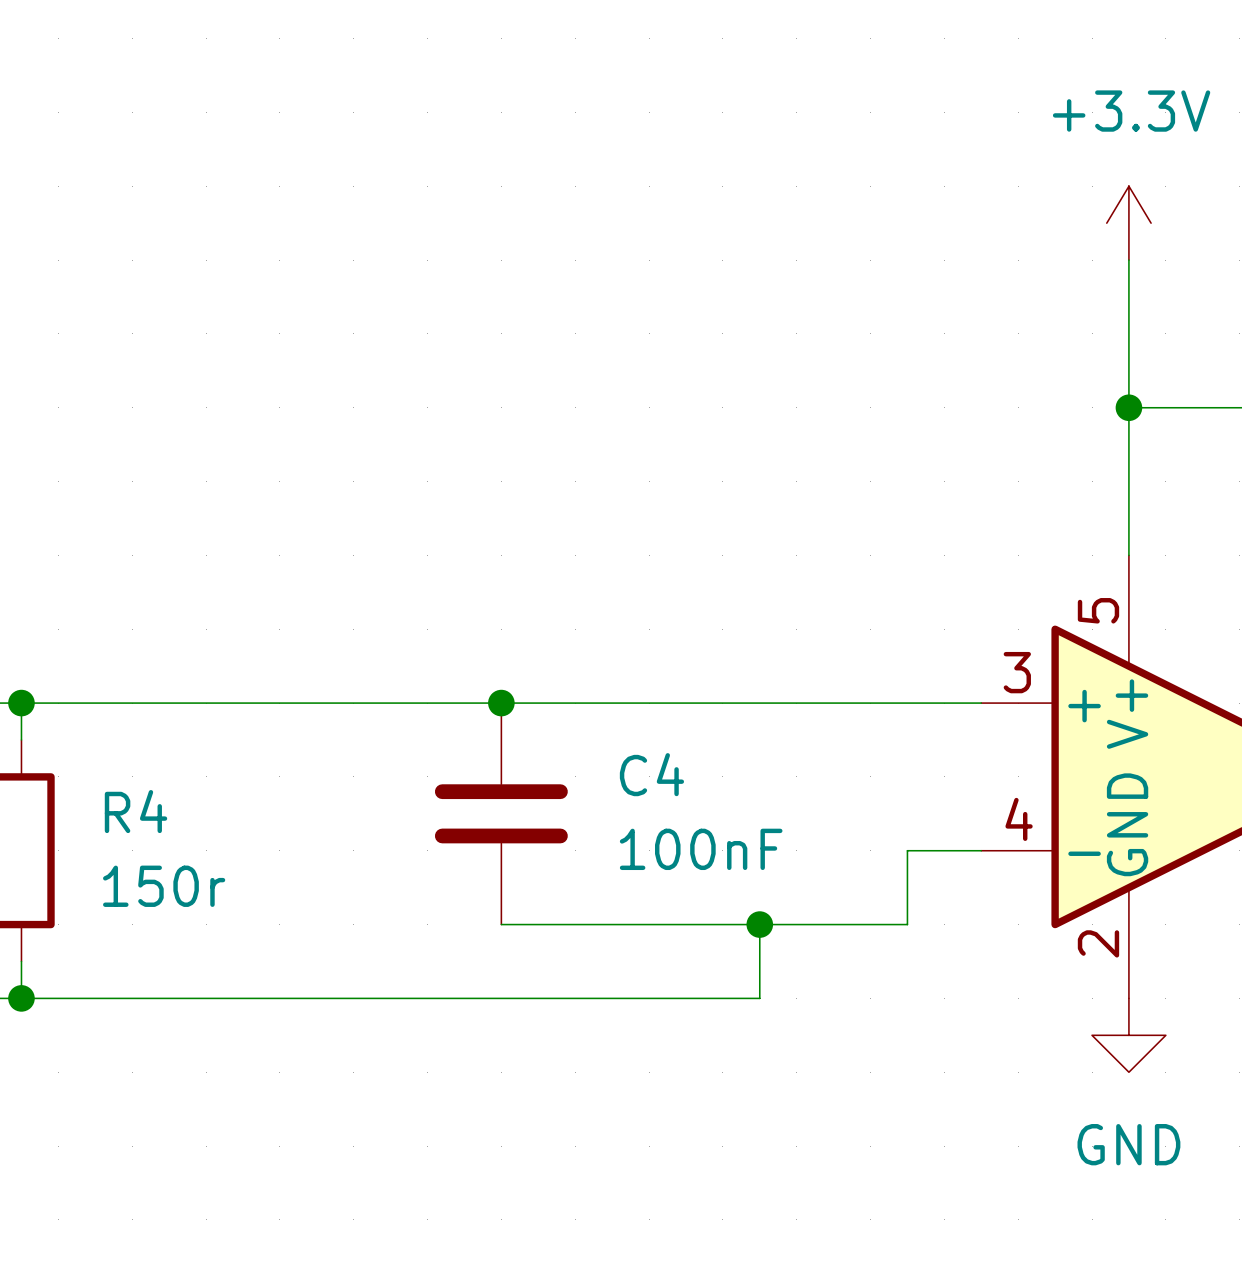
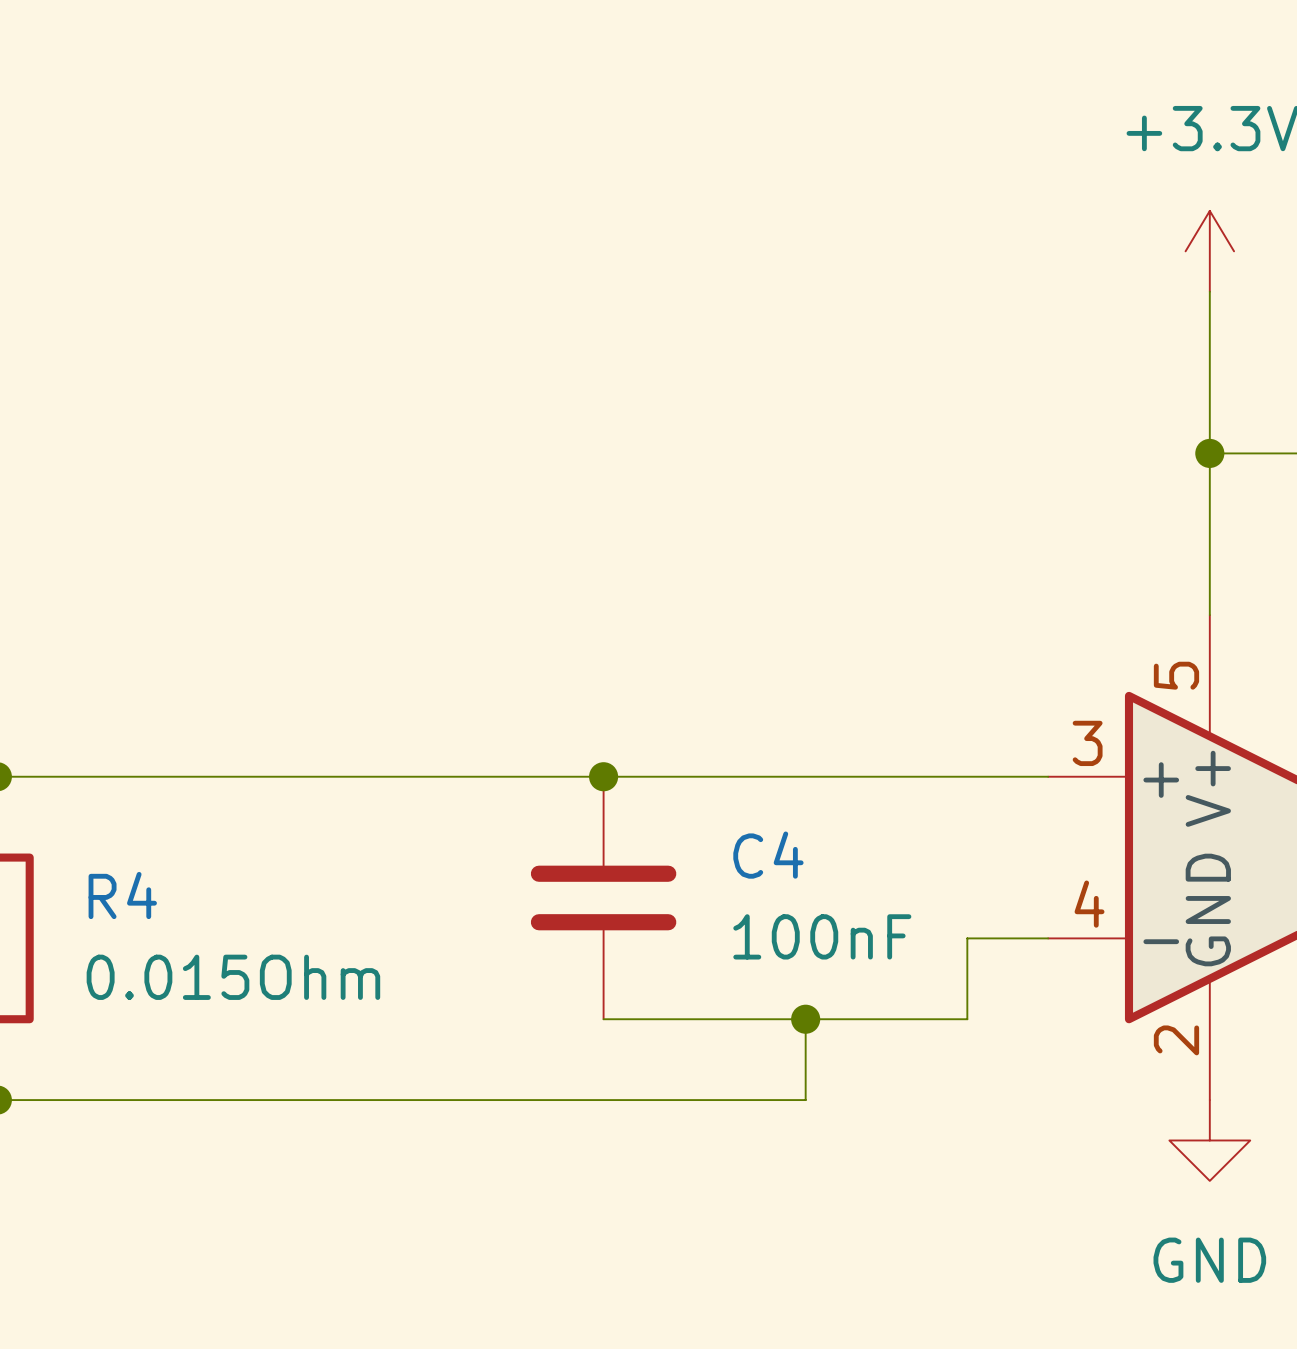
junction position: (501, 703) -> (603, 776)
C4 position: (501, 813) -> (603, 897)
R4 value: 150r (164, 886) -> 0.015Ohm (233, 977)
wire: (501, 924) (575, 924) -> none

